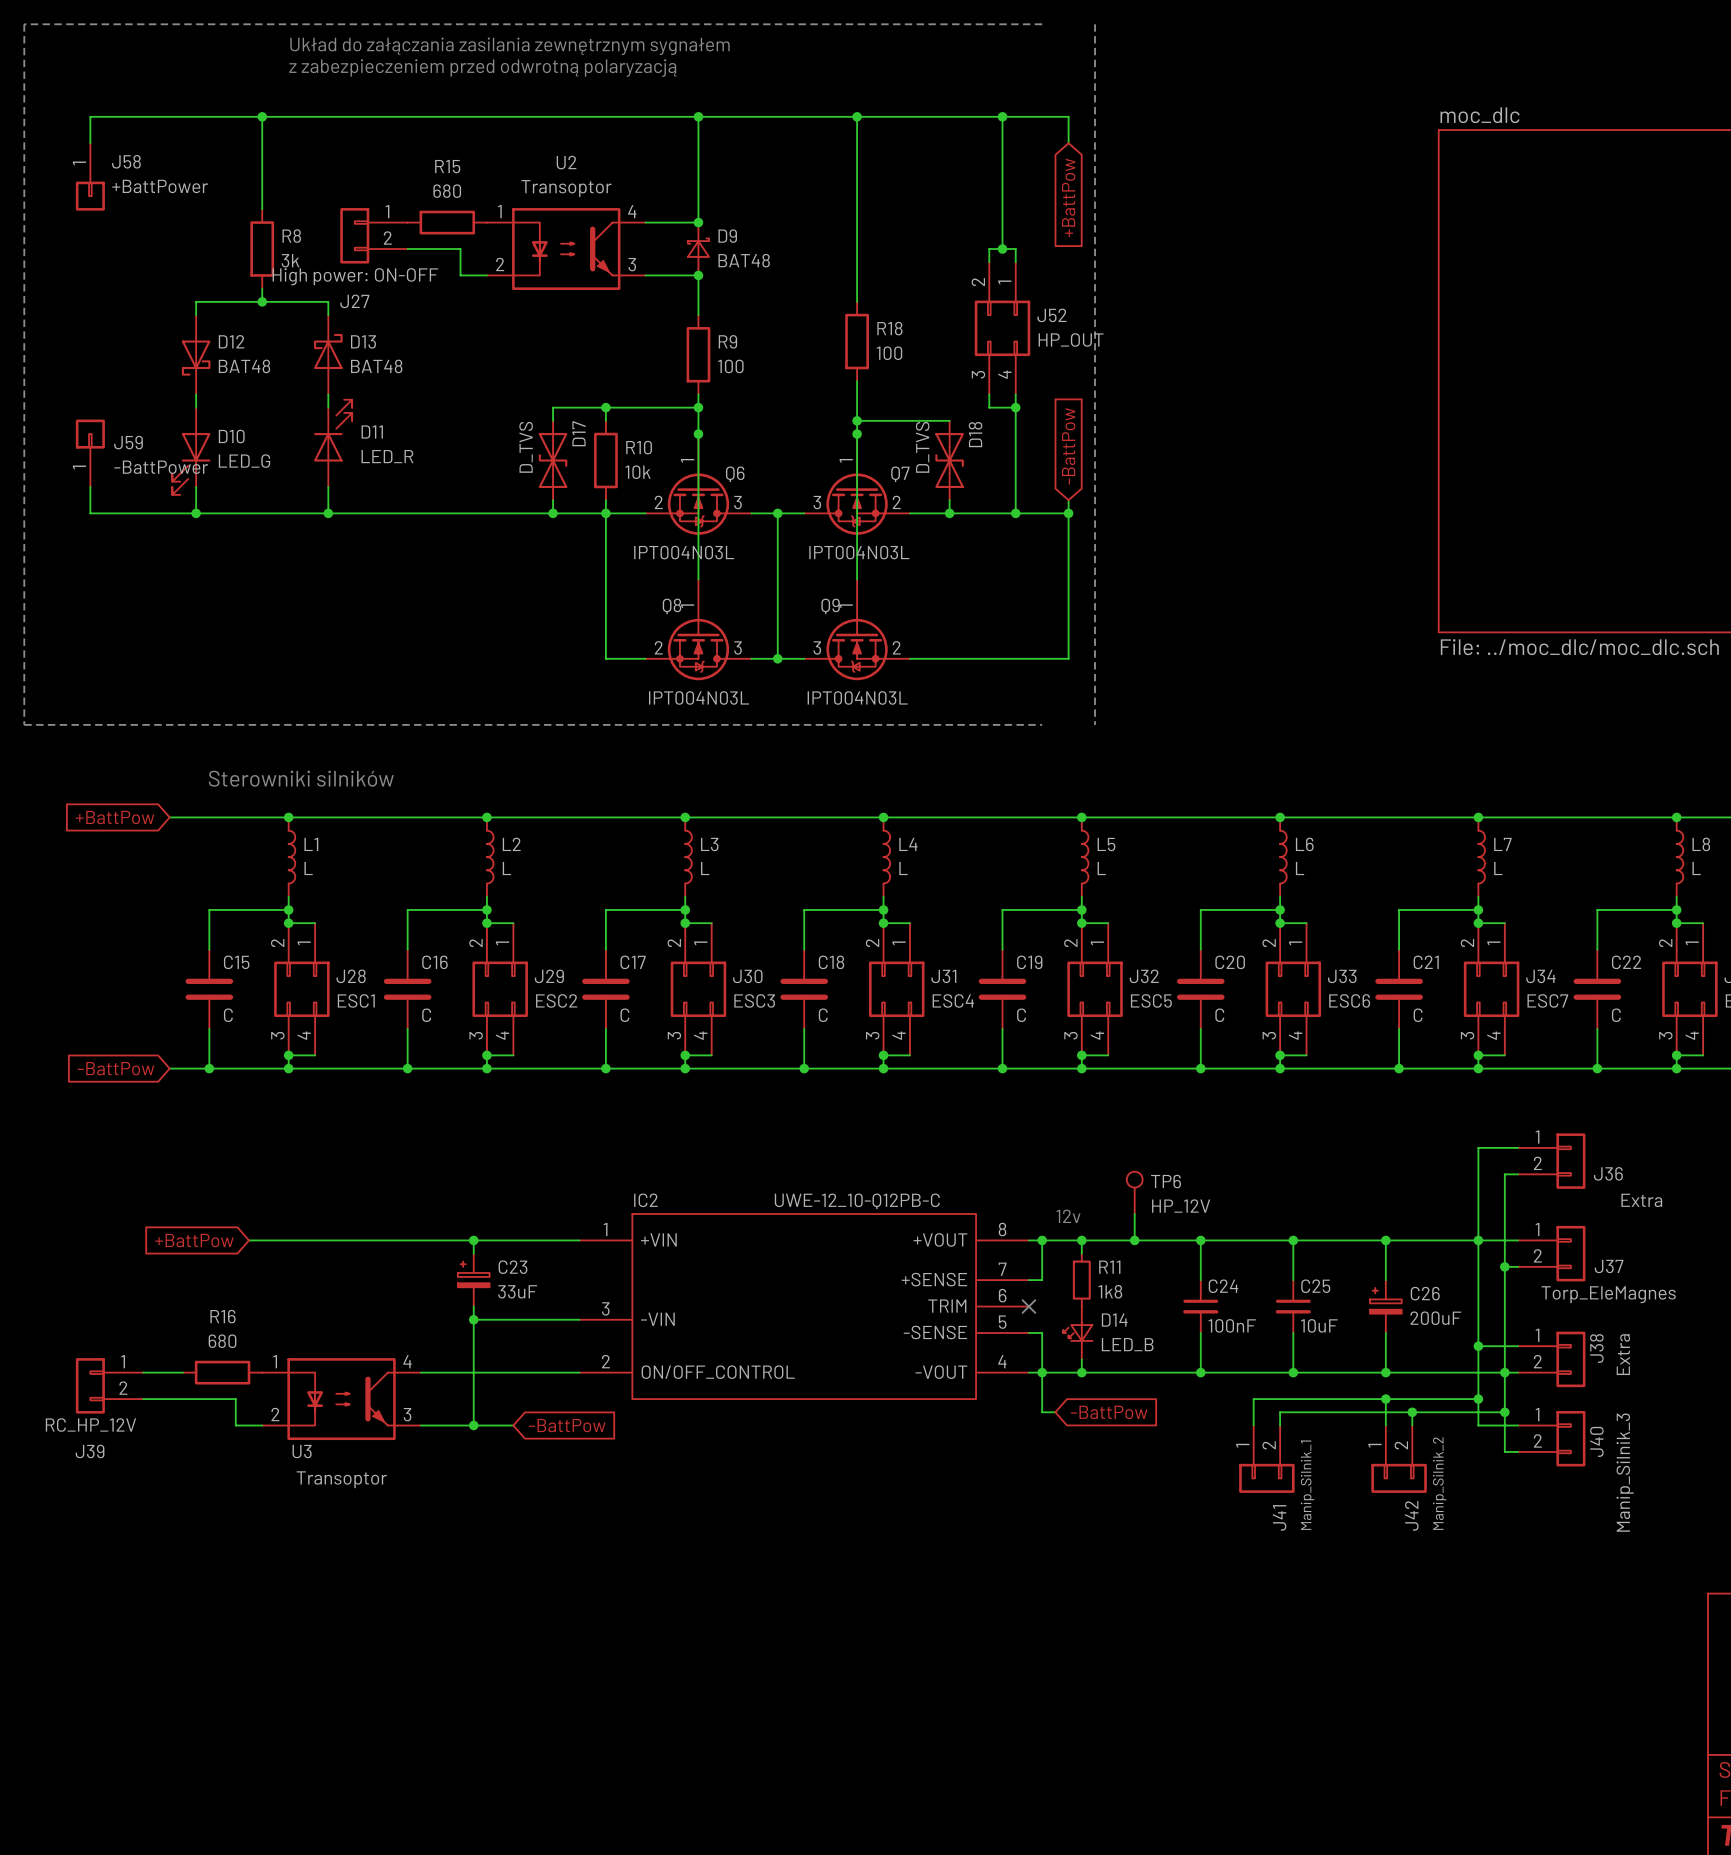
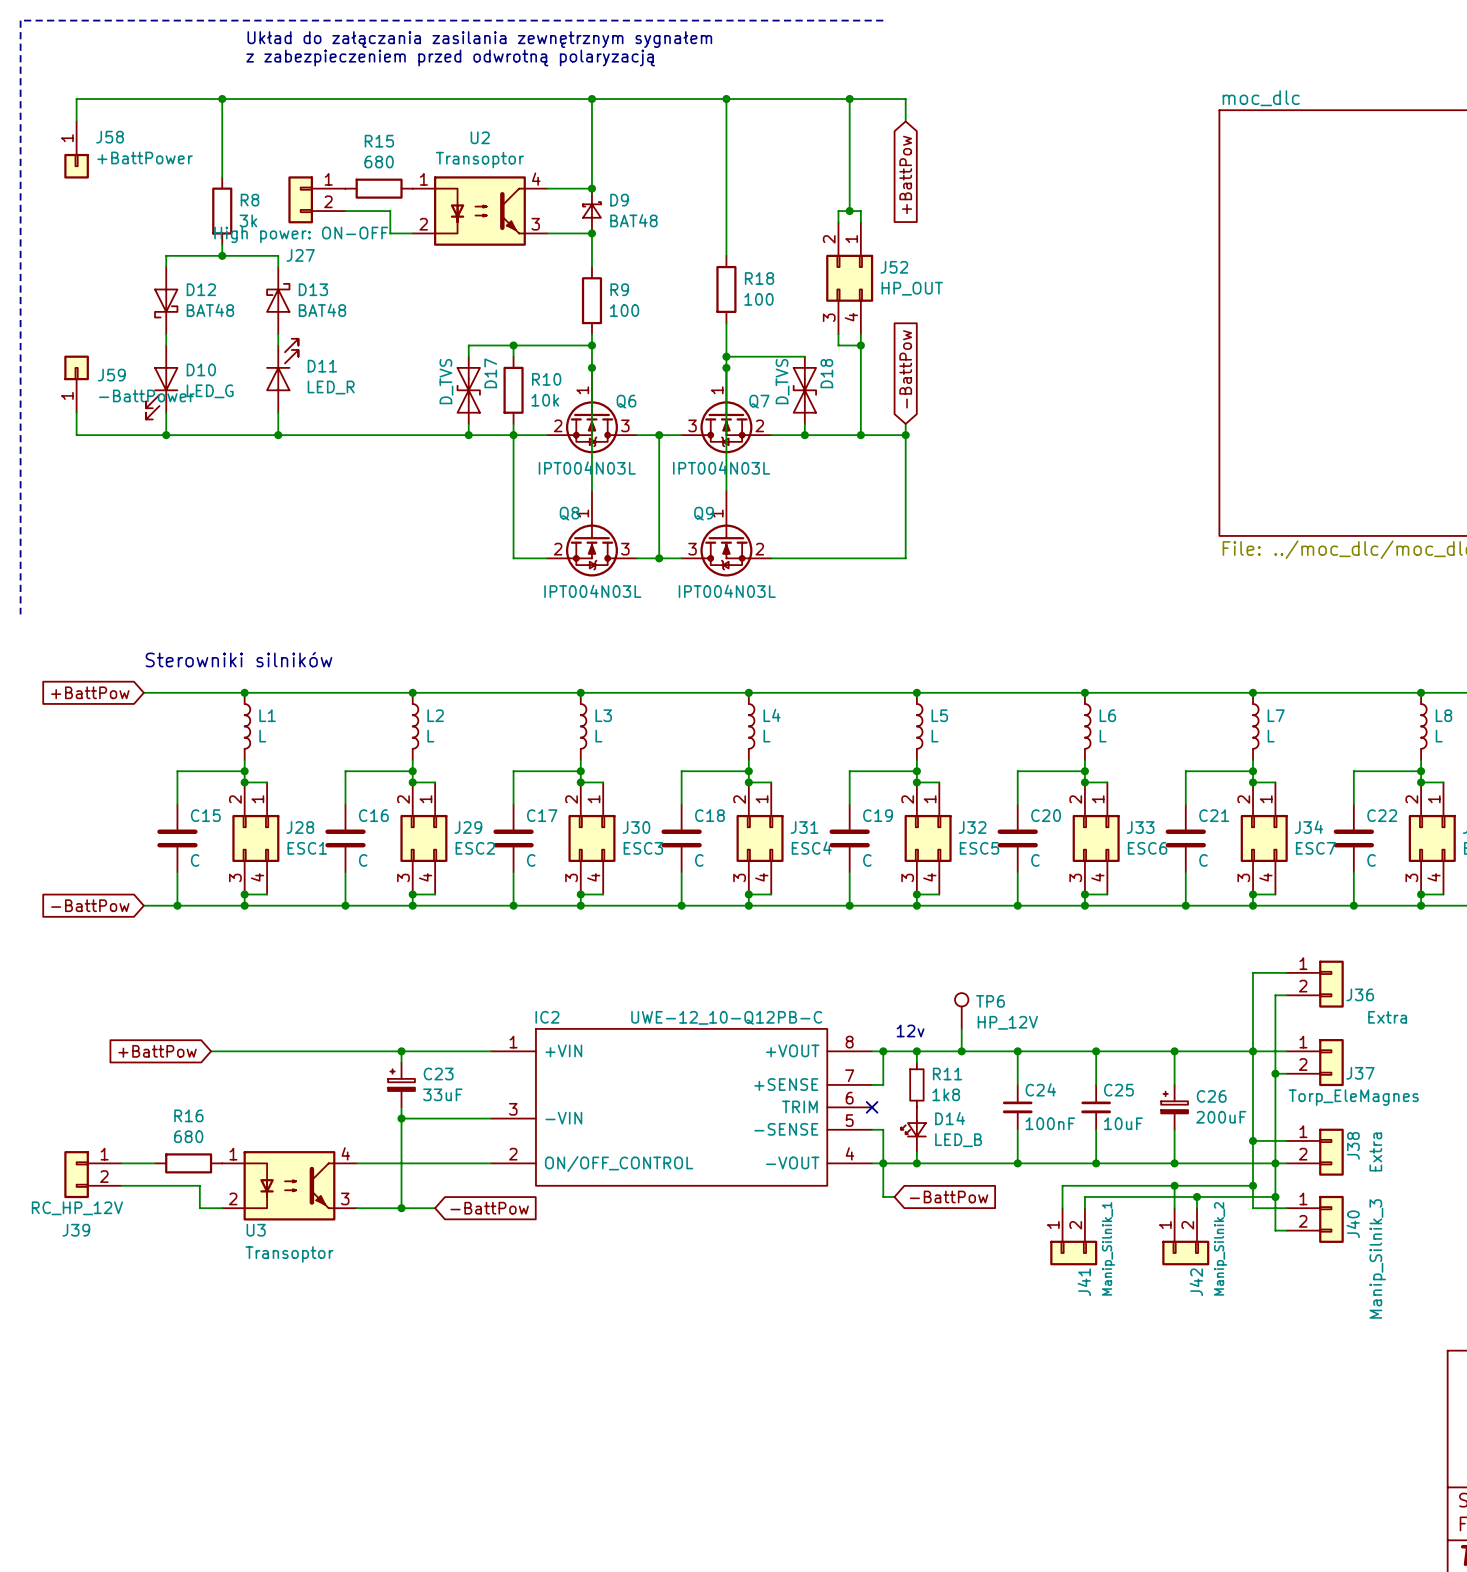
line: (1095, 24) (1095, 724) -> none
line: (24, 724) (1042, 724) -> none

